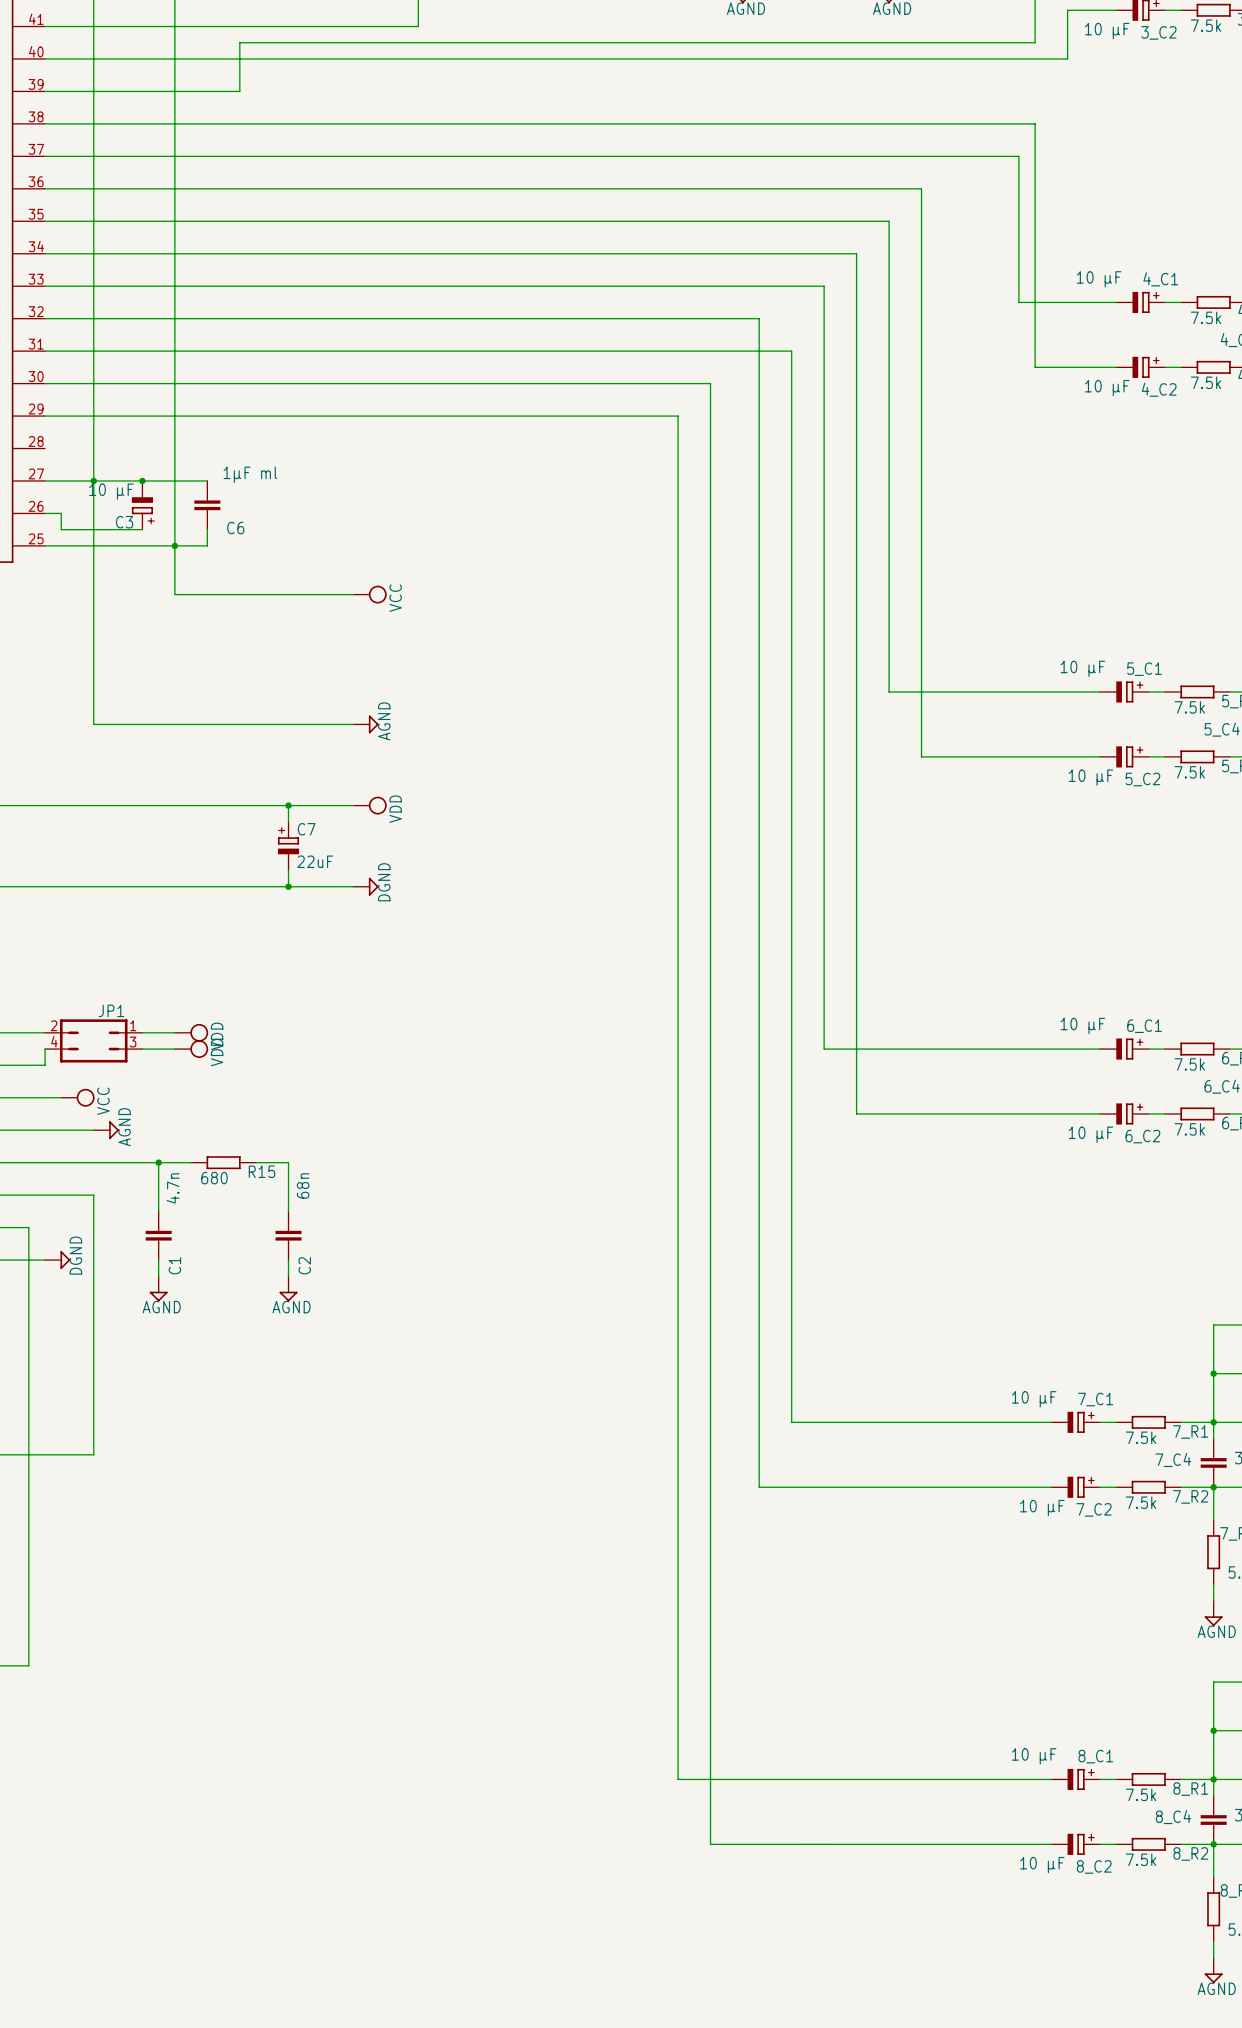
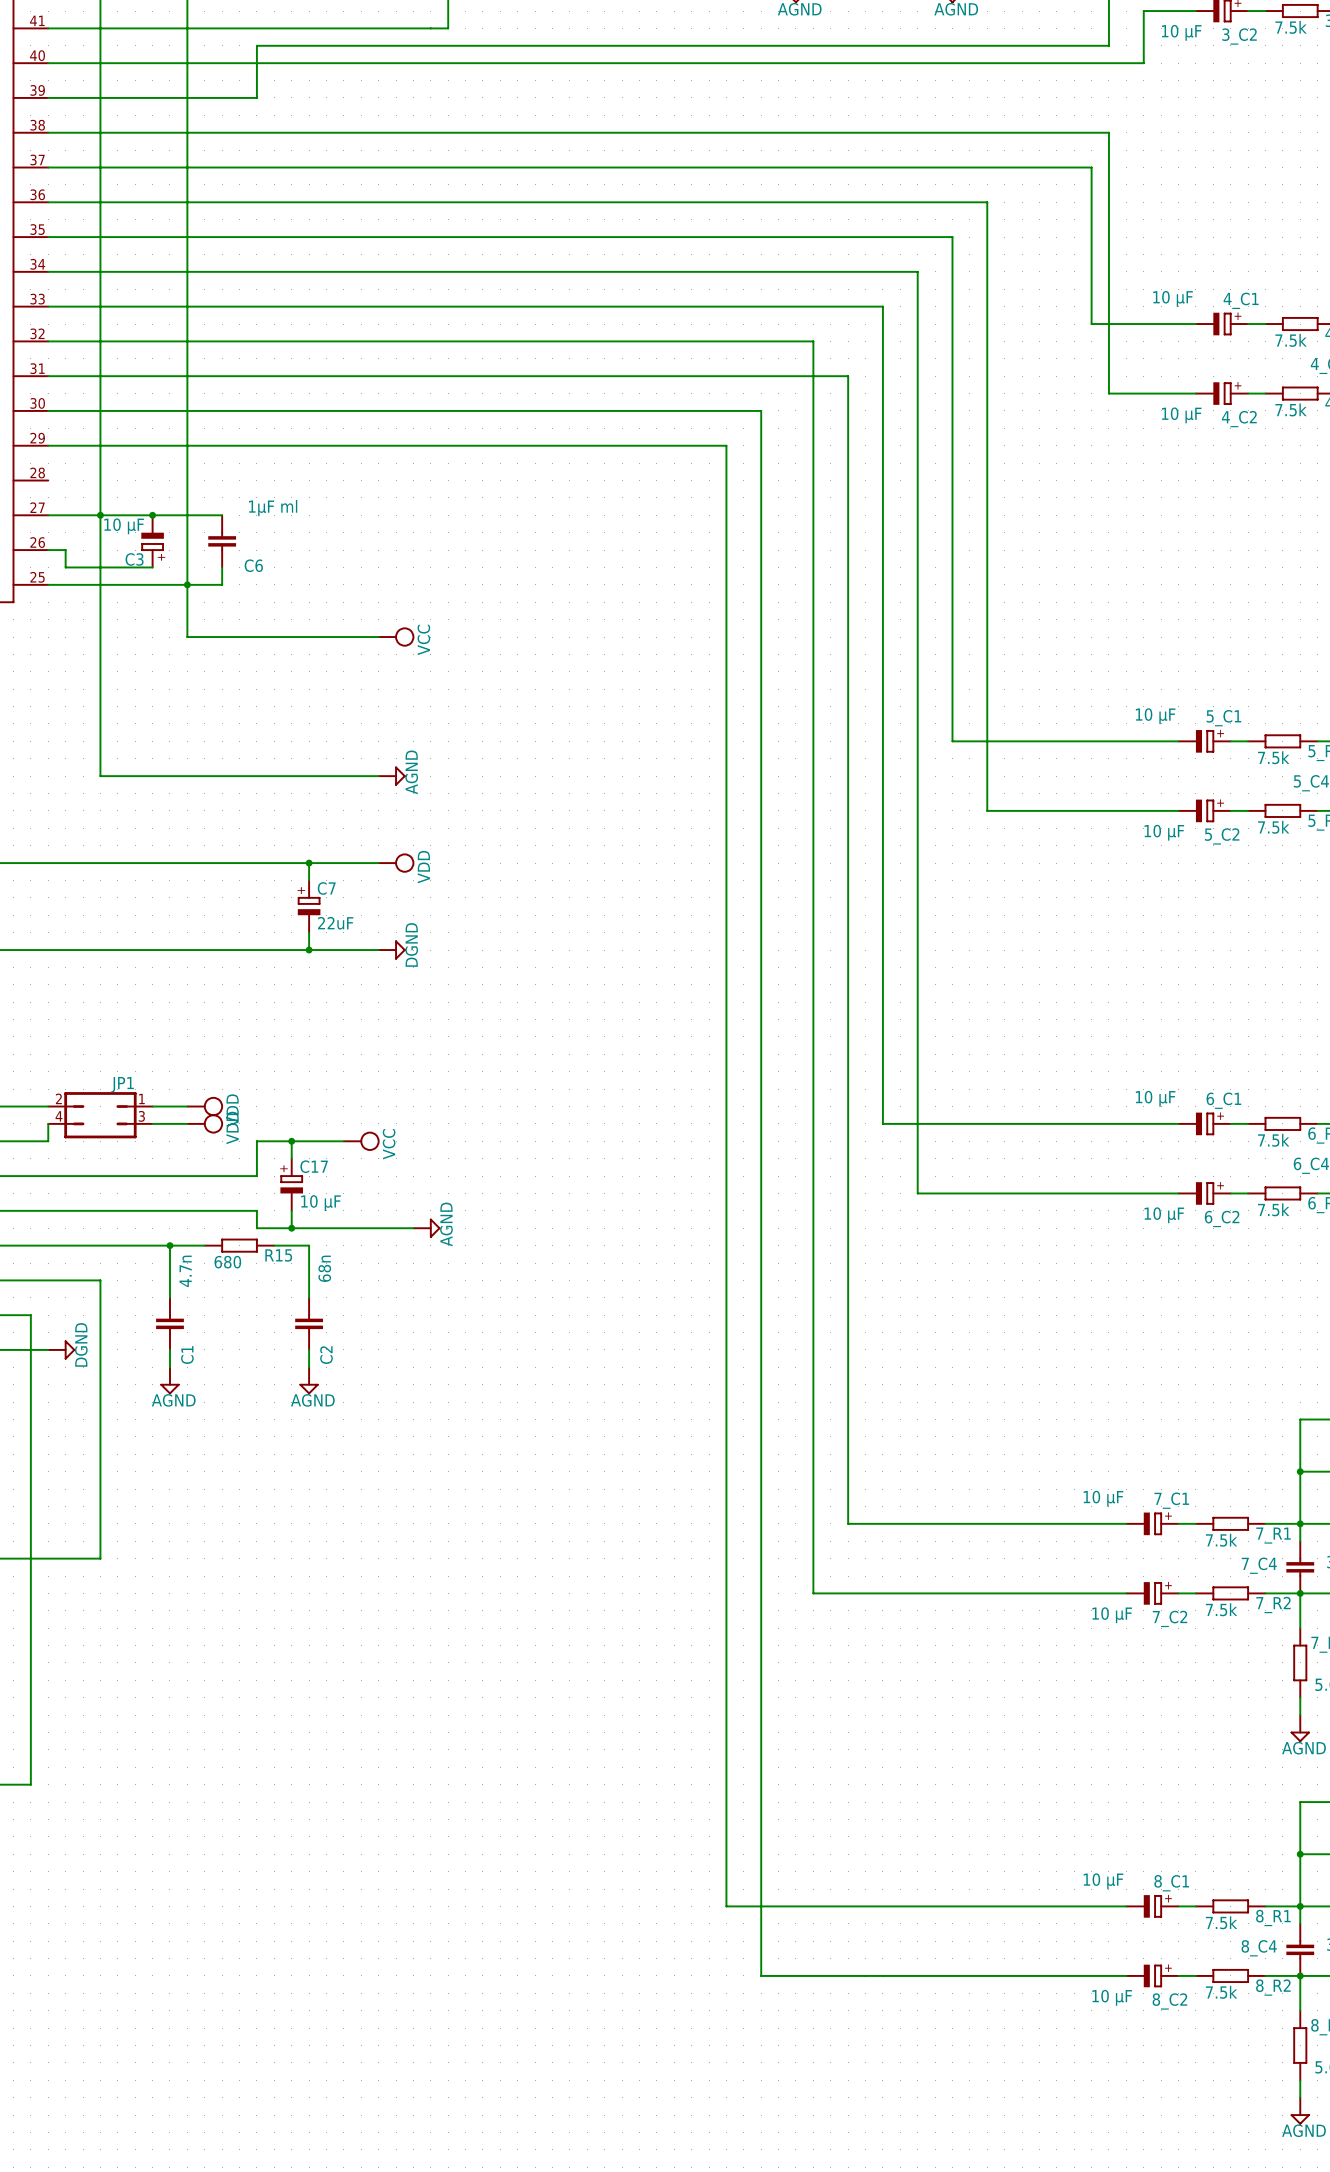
wire: none -> (291, 1141) (291, 1158)
junction: none -> (291, 1141)
wire: none -> (343, 1141) (256, 1141) (256, 1176) (65, 1176)
power symbol: none -> VCC (361, 1141)
power symbol: VCC (77, 1097) -> none
C17: none -> 10 µF (291, 1184)
wire: none -> (100, 1210) (256, 1210) (256, 1228) (413, 1228)
power symbol: AGND (106, 1130) -> none
wire: none -> (291, 1210) (291, 1228)
junction: none -> (291, 1228)
power symbol: none -> AGND (426, 1228)

